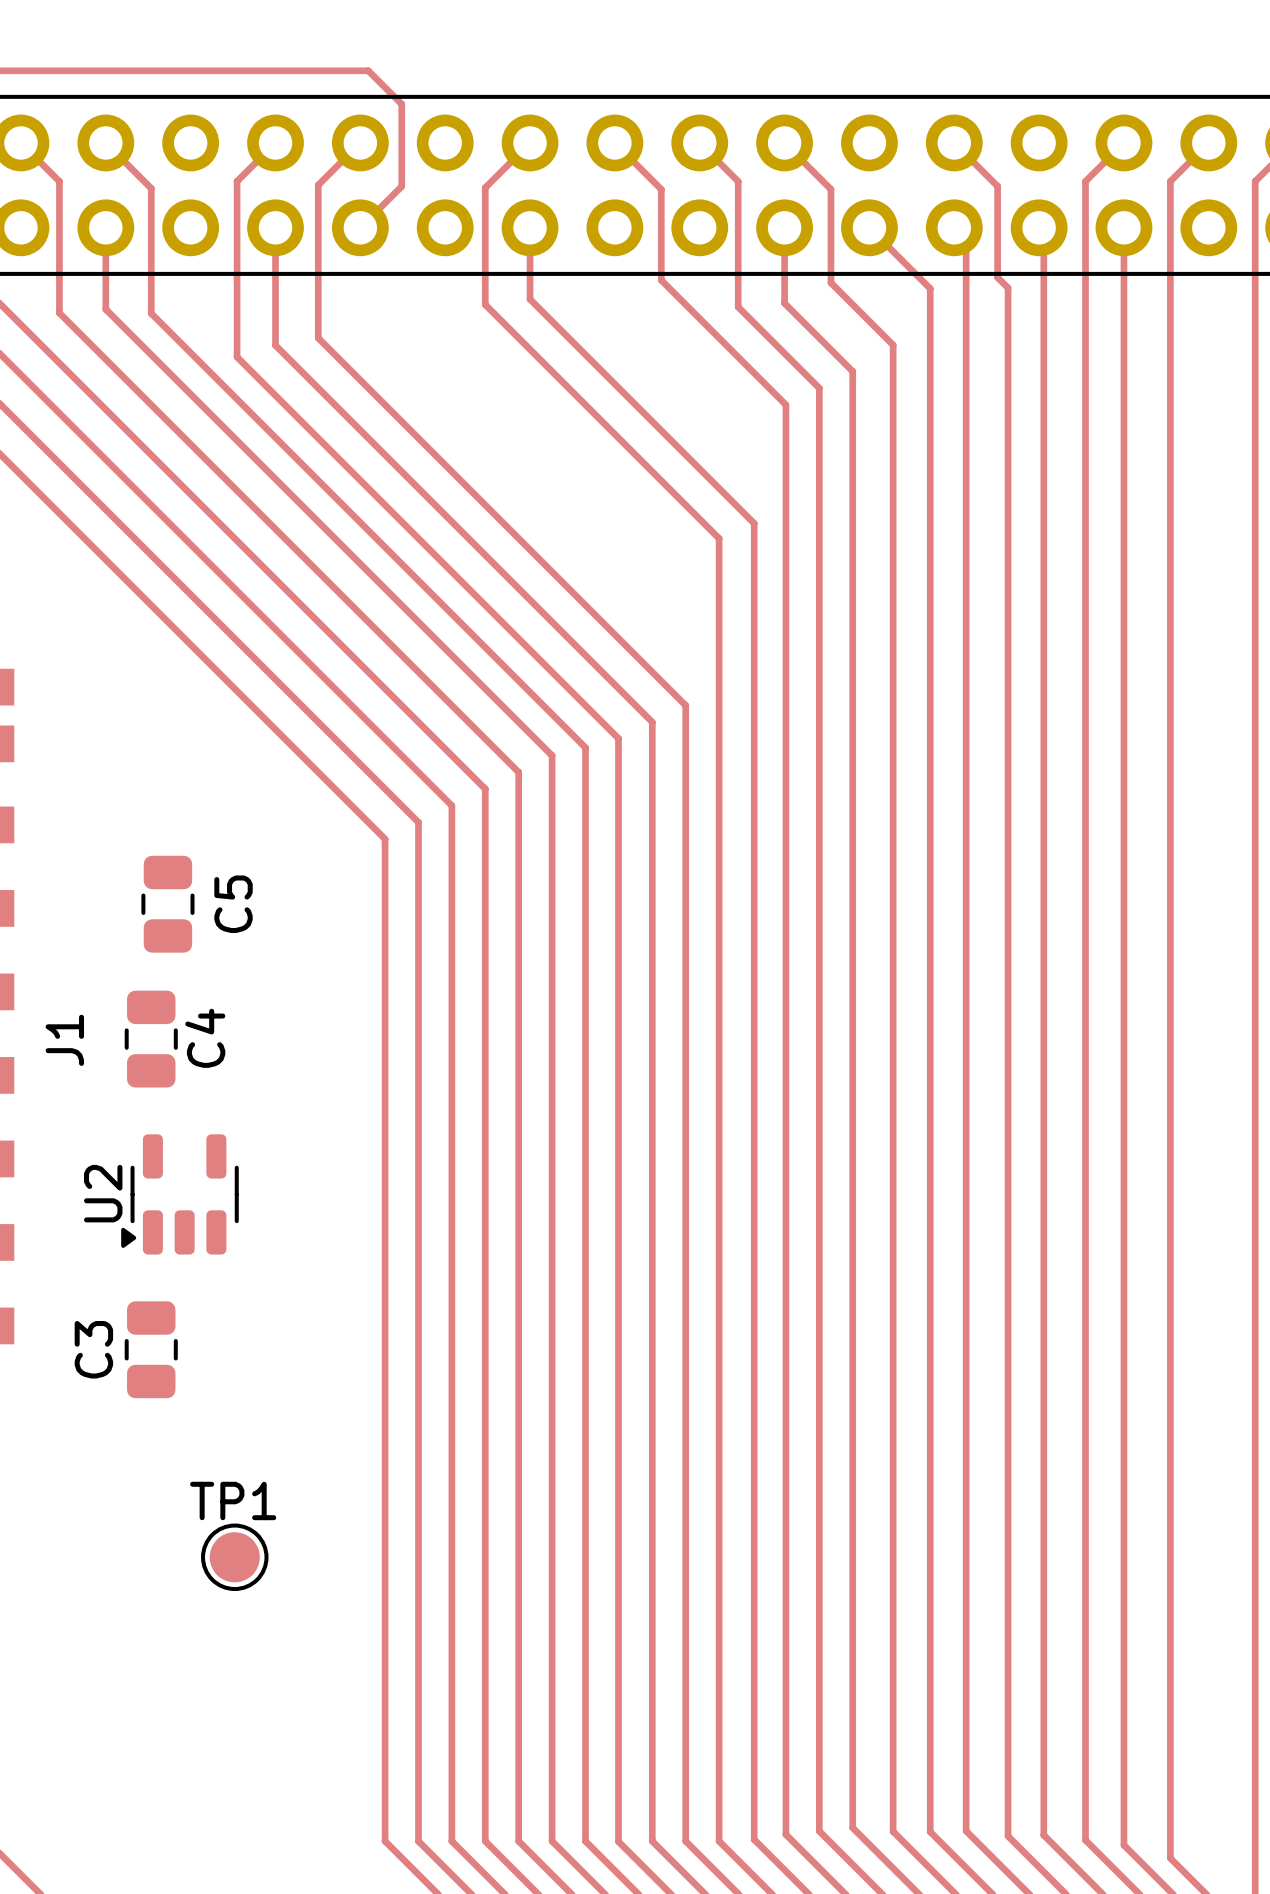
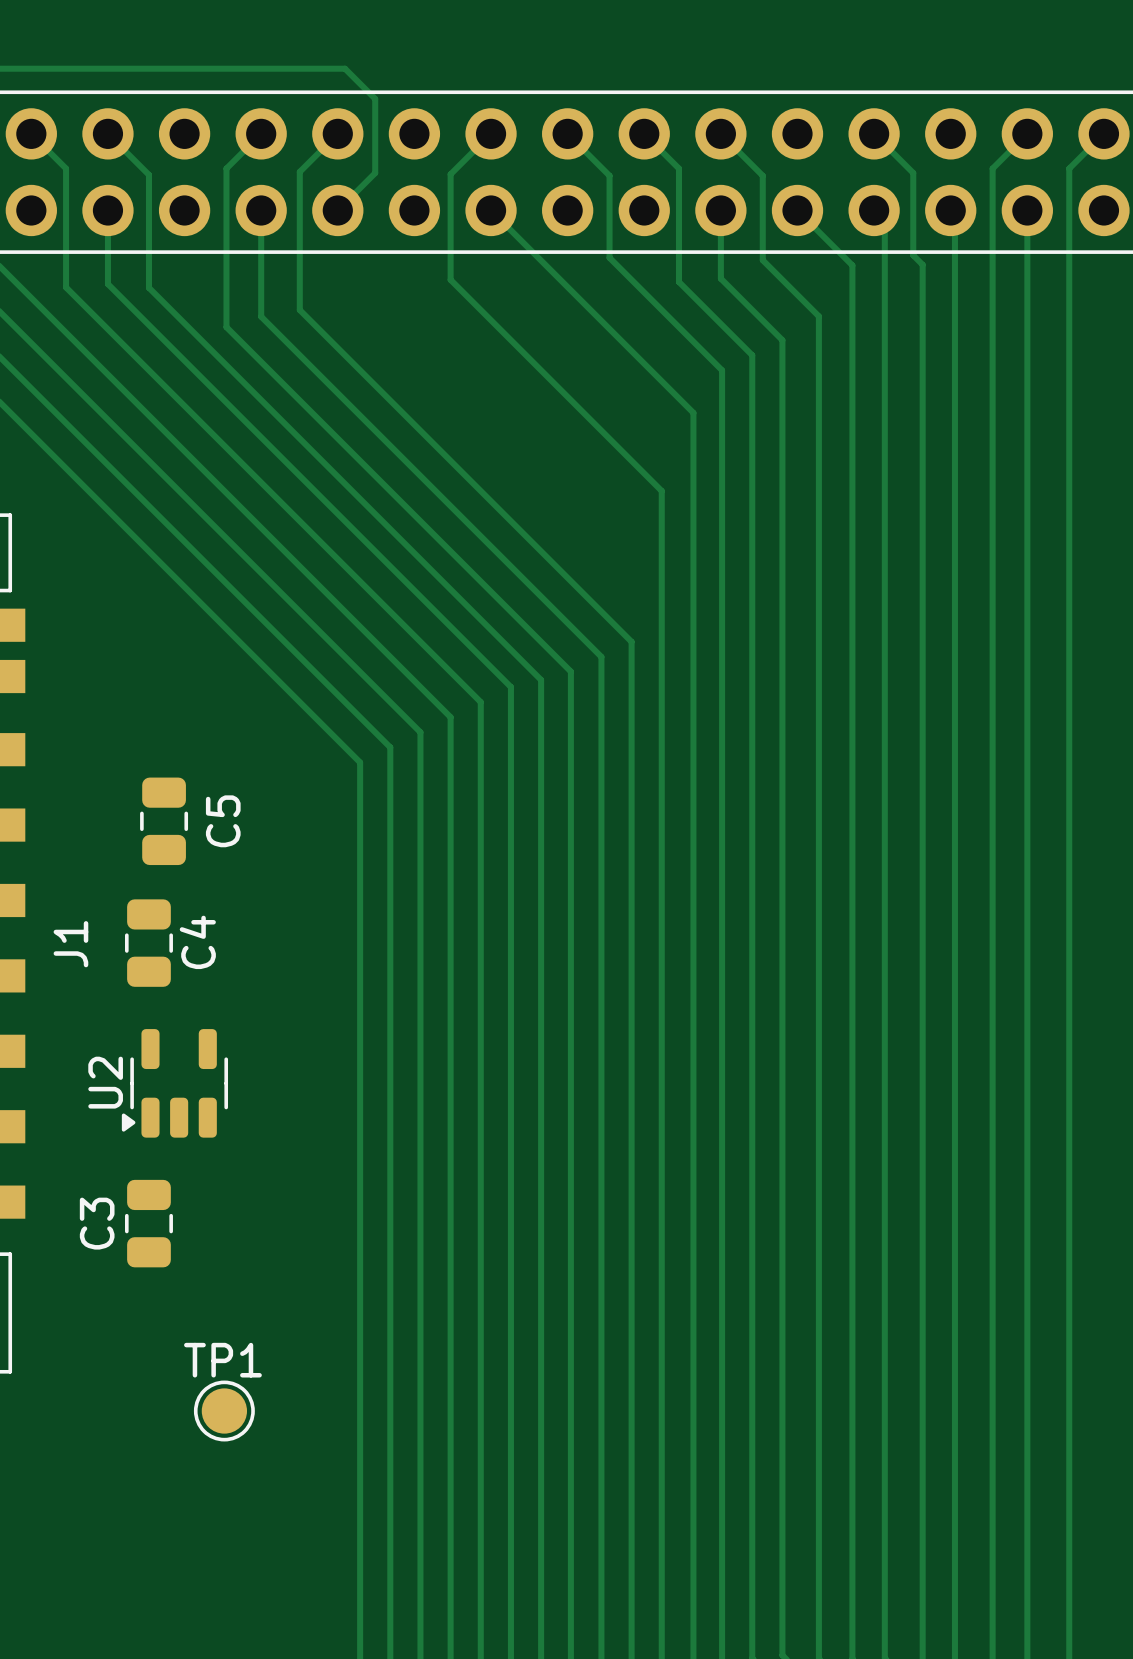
track: (530, 227) (530, 299) (754, 523) -> (491, 210) (693, 412) (693, 477)

